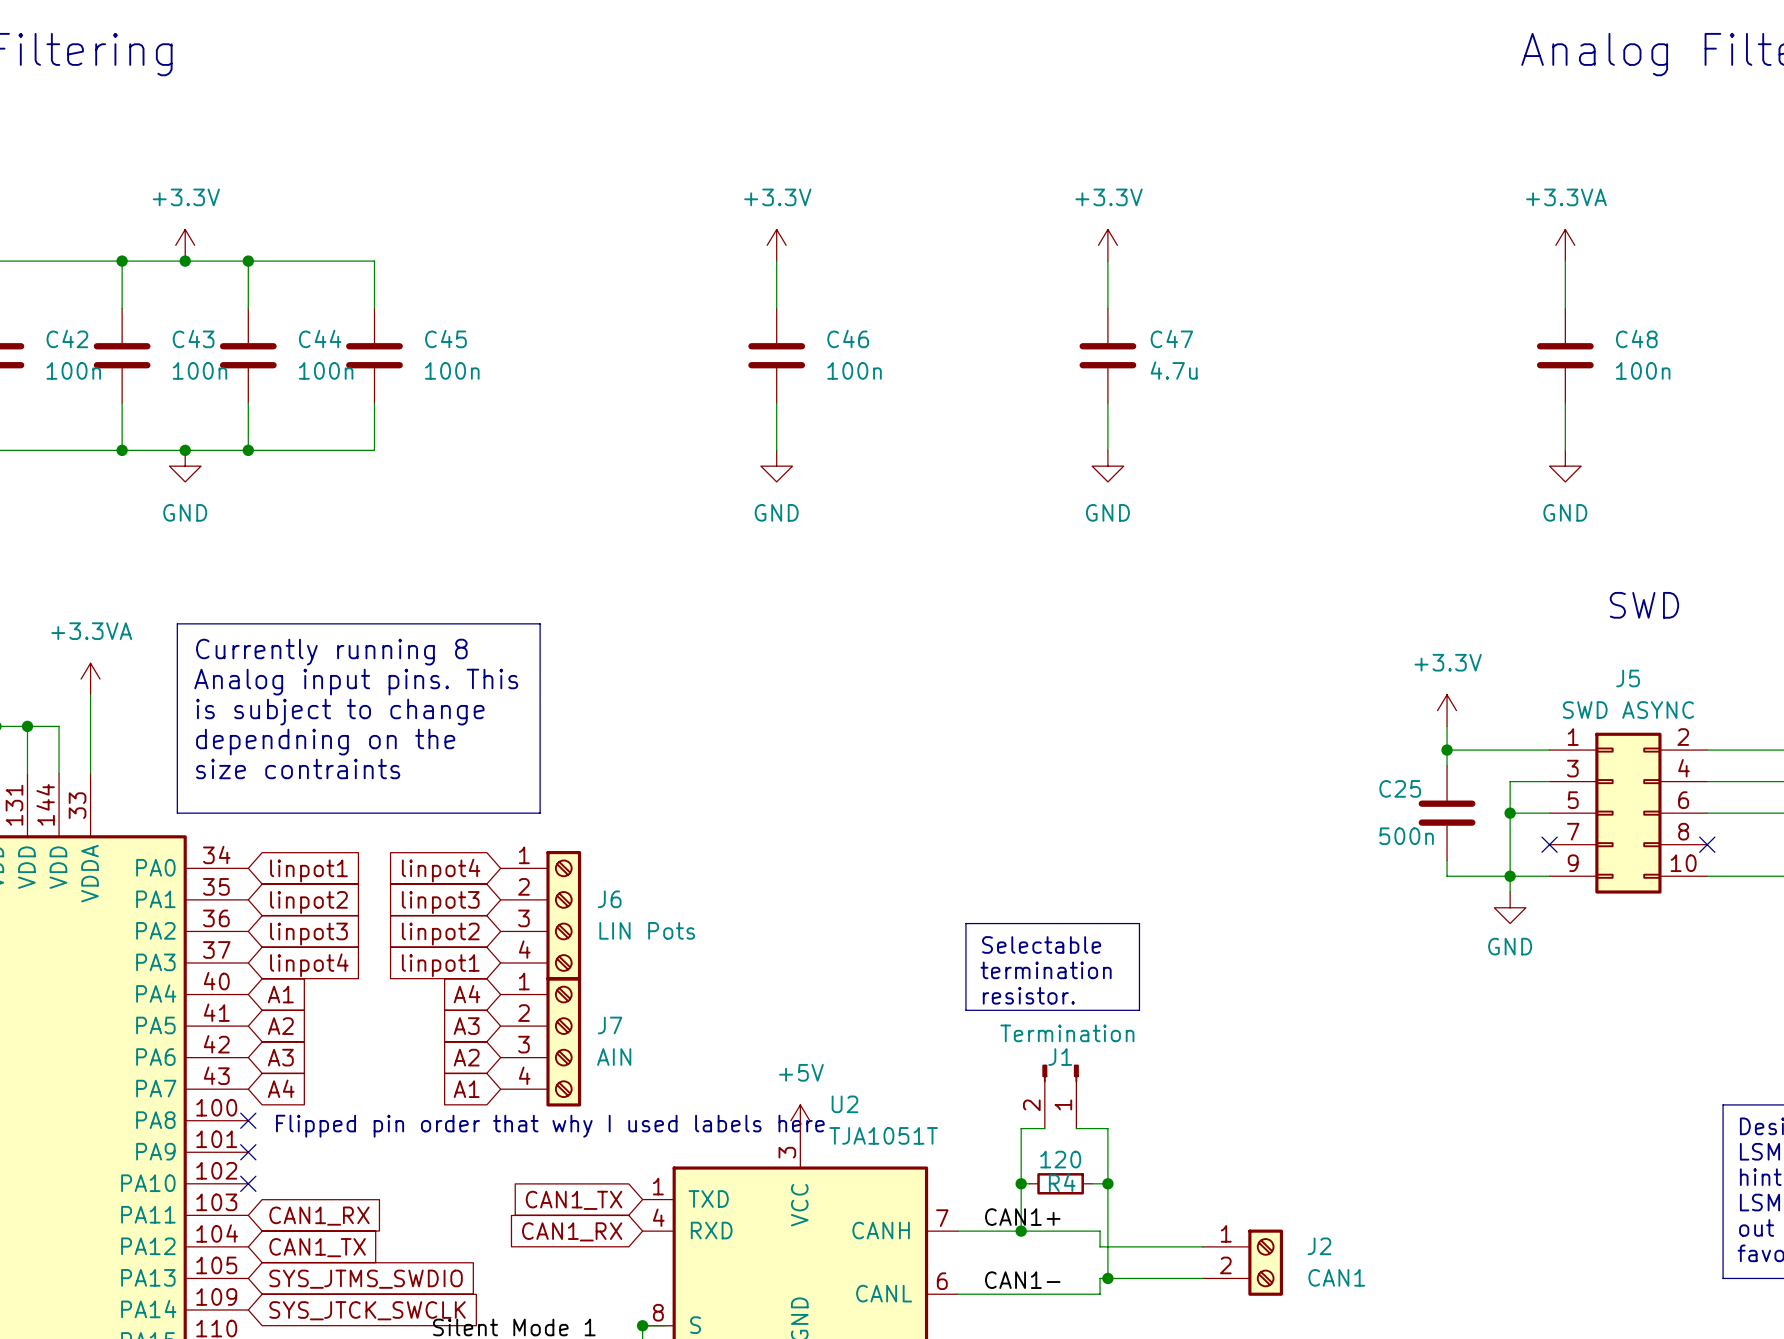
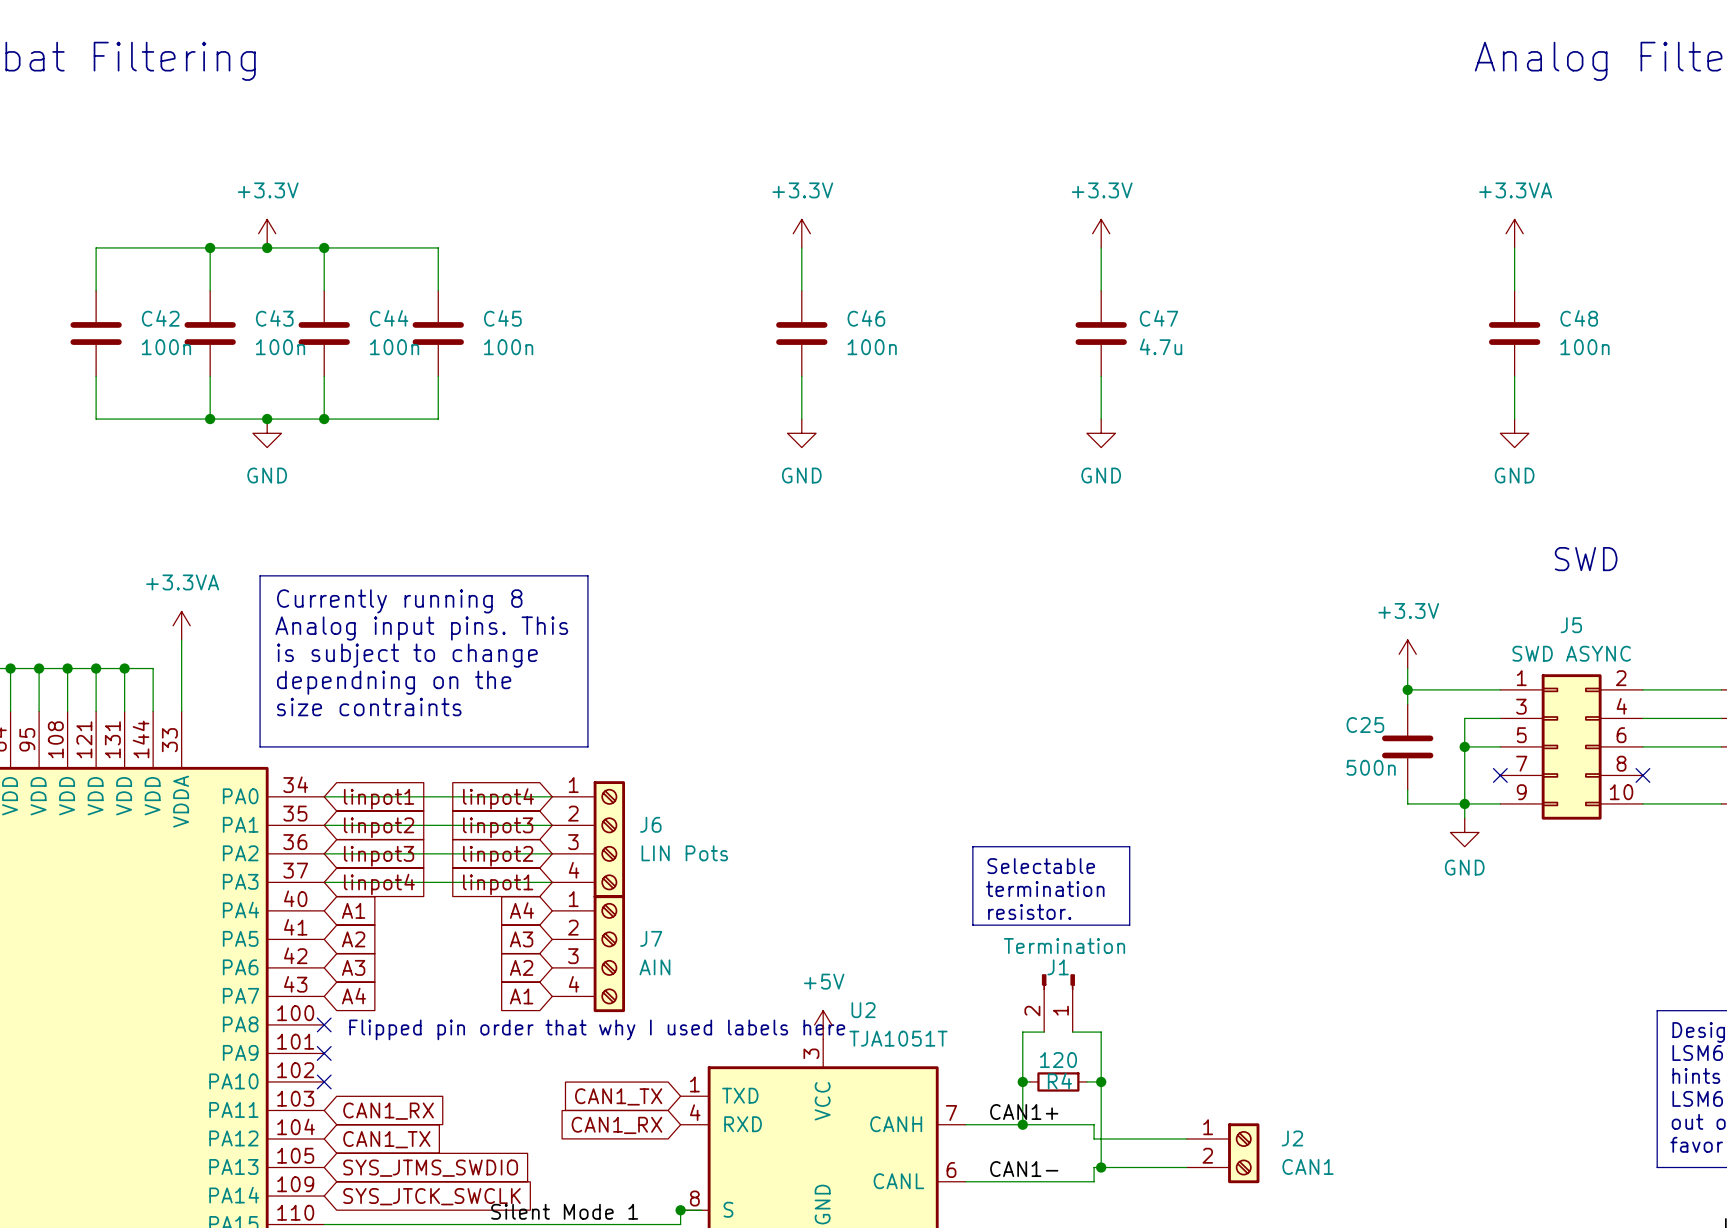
wire: none -> (324, 796) (552, 796)
wire: none -> (324, 825) (552, 825)
wire: none -> (324, 853) (552, 853)
wire: none -> (324, 882) (552, 882)

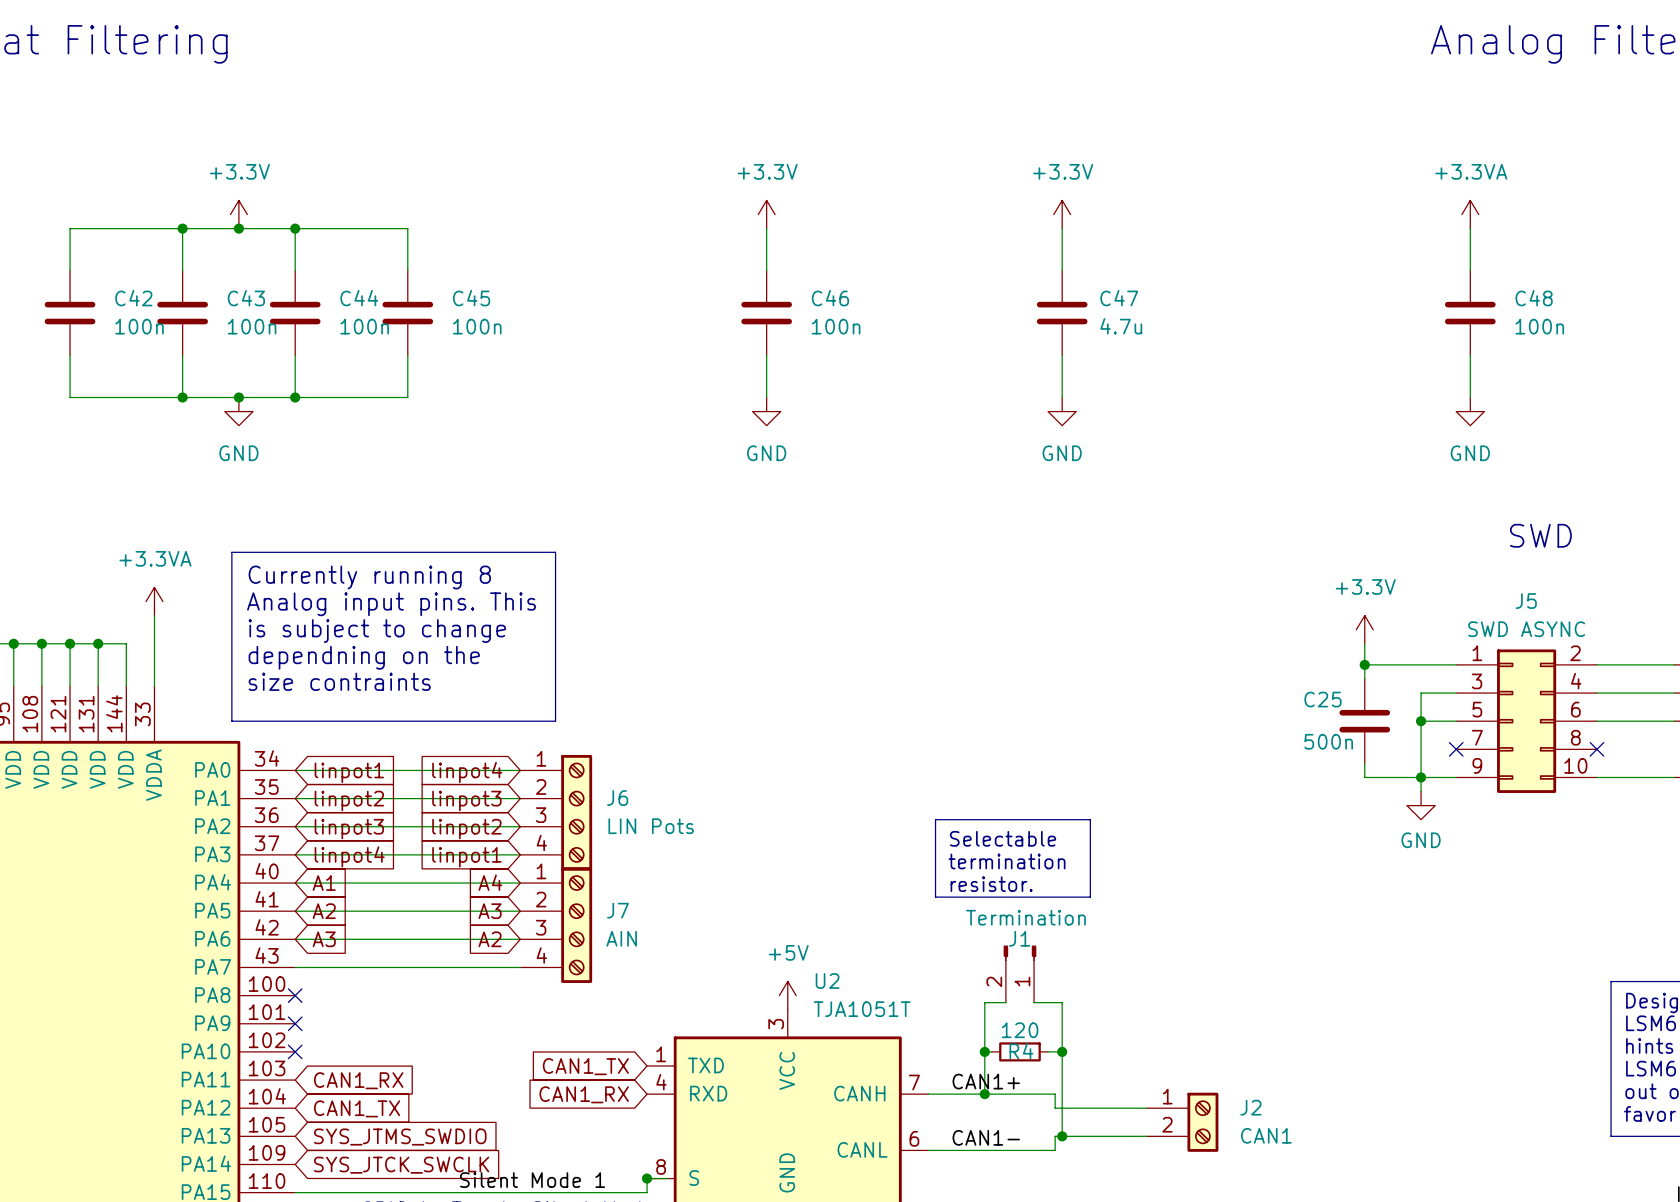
wire: none -> (295, 883) (520, 883)
wire: none -> (295, 911) (520, 911)
wire: none -> (295, 939) (520, 939)
wire: none -> (295, 967) (520, 967)
global label: A4 (353, 996) -> none
global label: A1 (521, 996) -> none
text: Flipped pin order that why I used labels here (597, 1029) -> none

